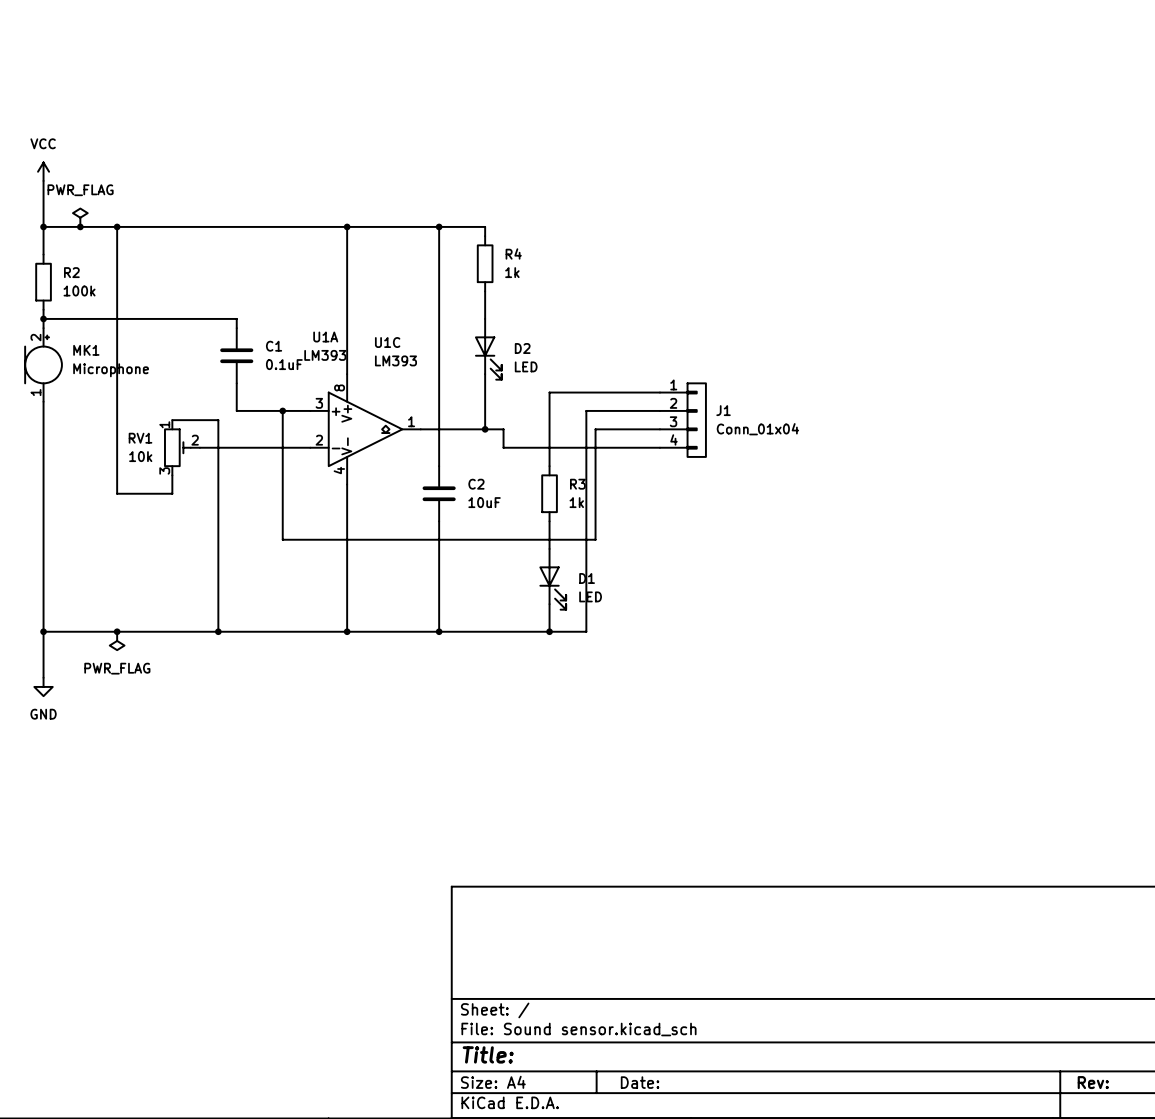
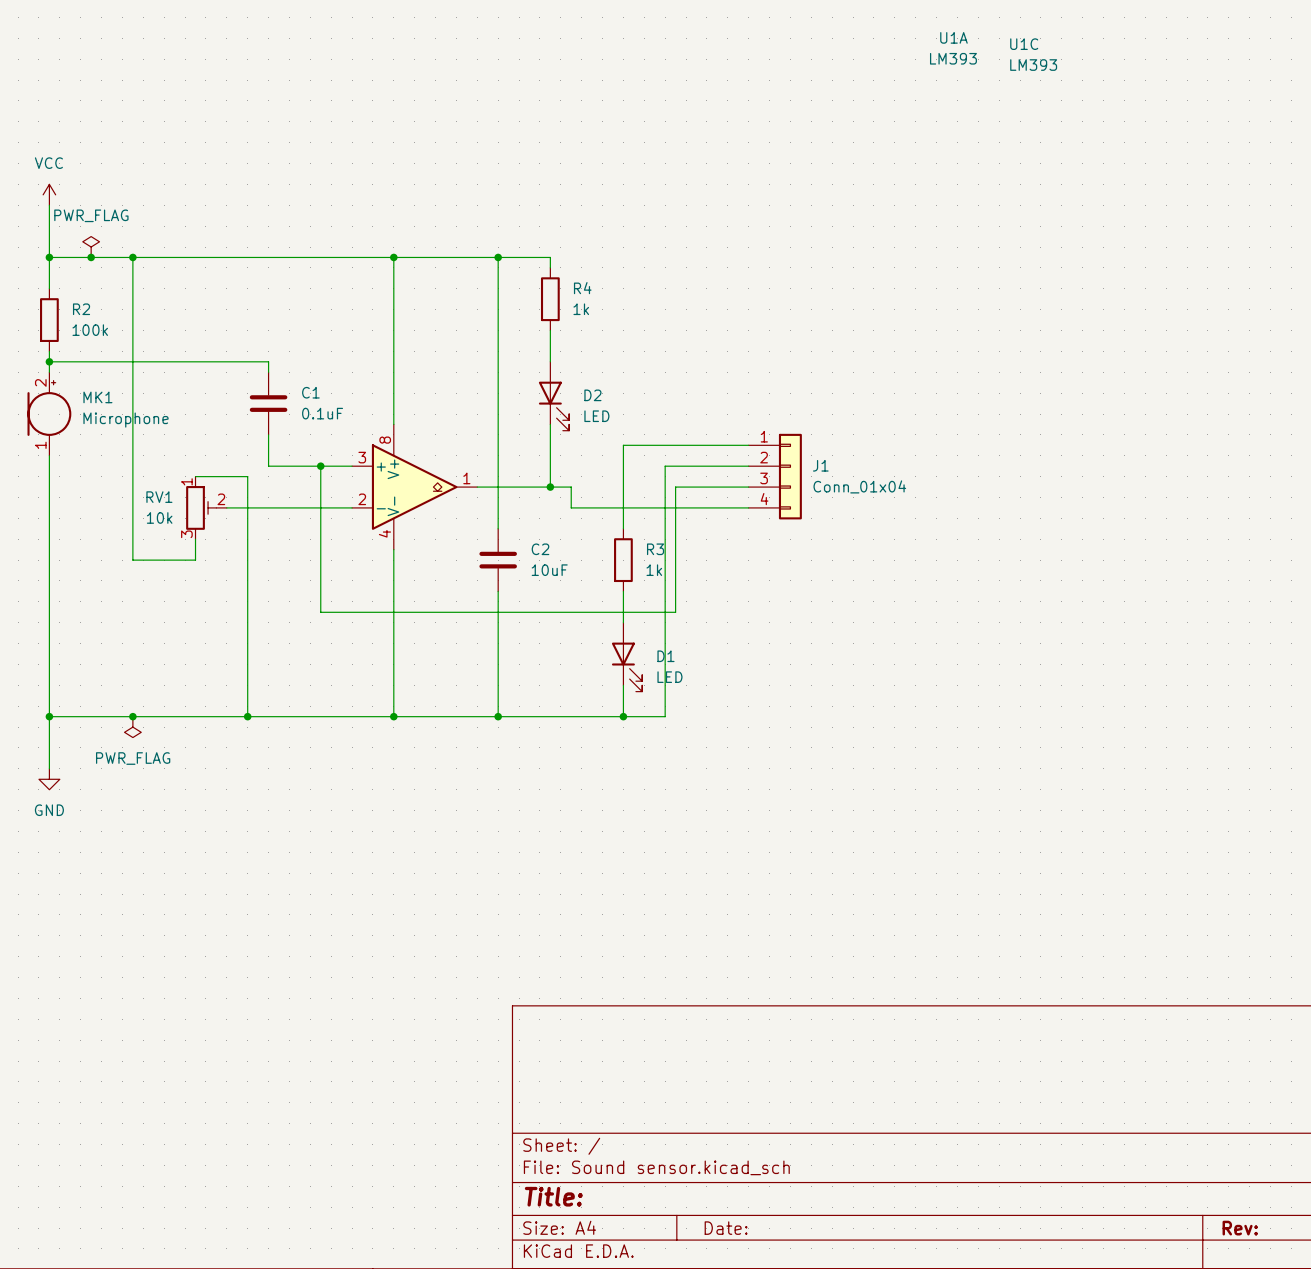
U1A name position: U1A (325, 337) -> U1A (953, 37)
U1C name position: U1C (387, 342) -> U1C (1024, 44)
U1A value position: LM393 (325, 355) -> LM393 (953, 58)
U1C value position: LM393 (395, 360) -> LM393 (1033, 65)

